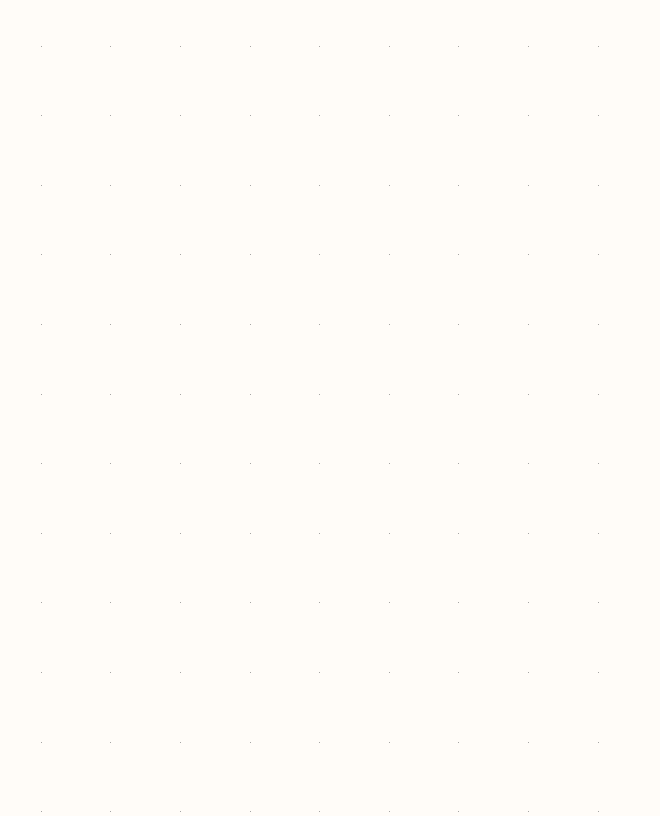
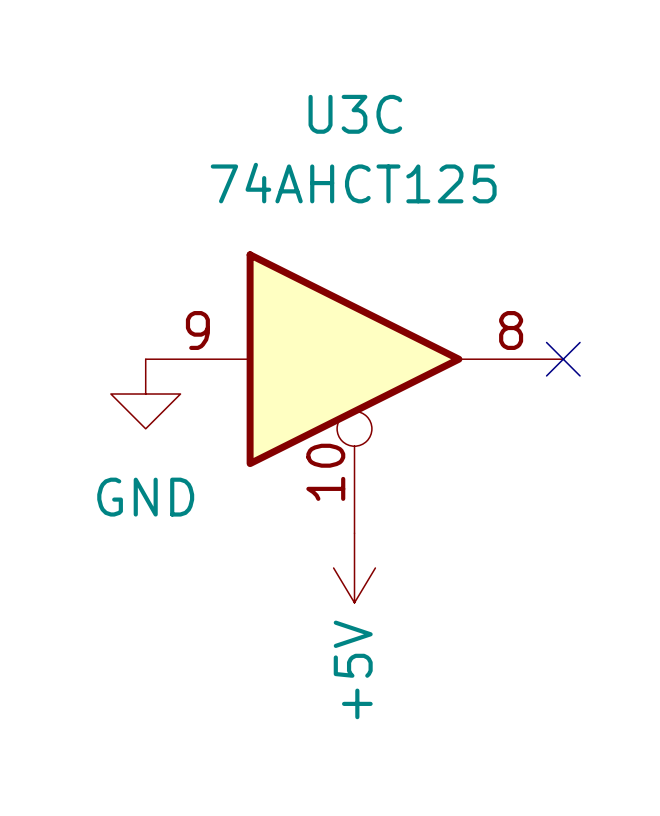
no-connect mark: none -> (563, 359)
U3C: none -> 74AHCT125 (354, 392)
power symbol: none -> GND (145, 394)
power symbol: none -> +5V (354, 568)

